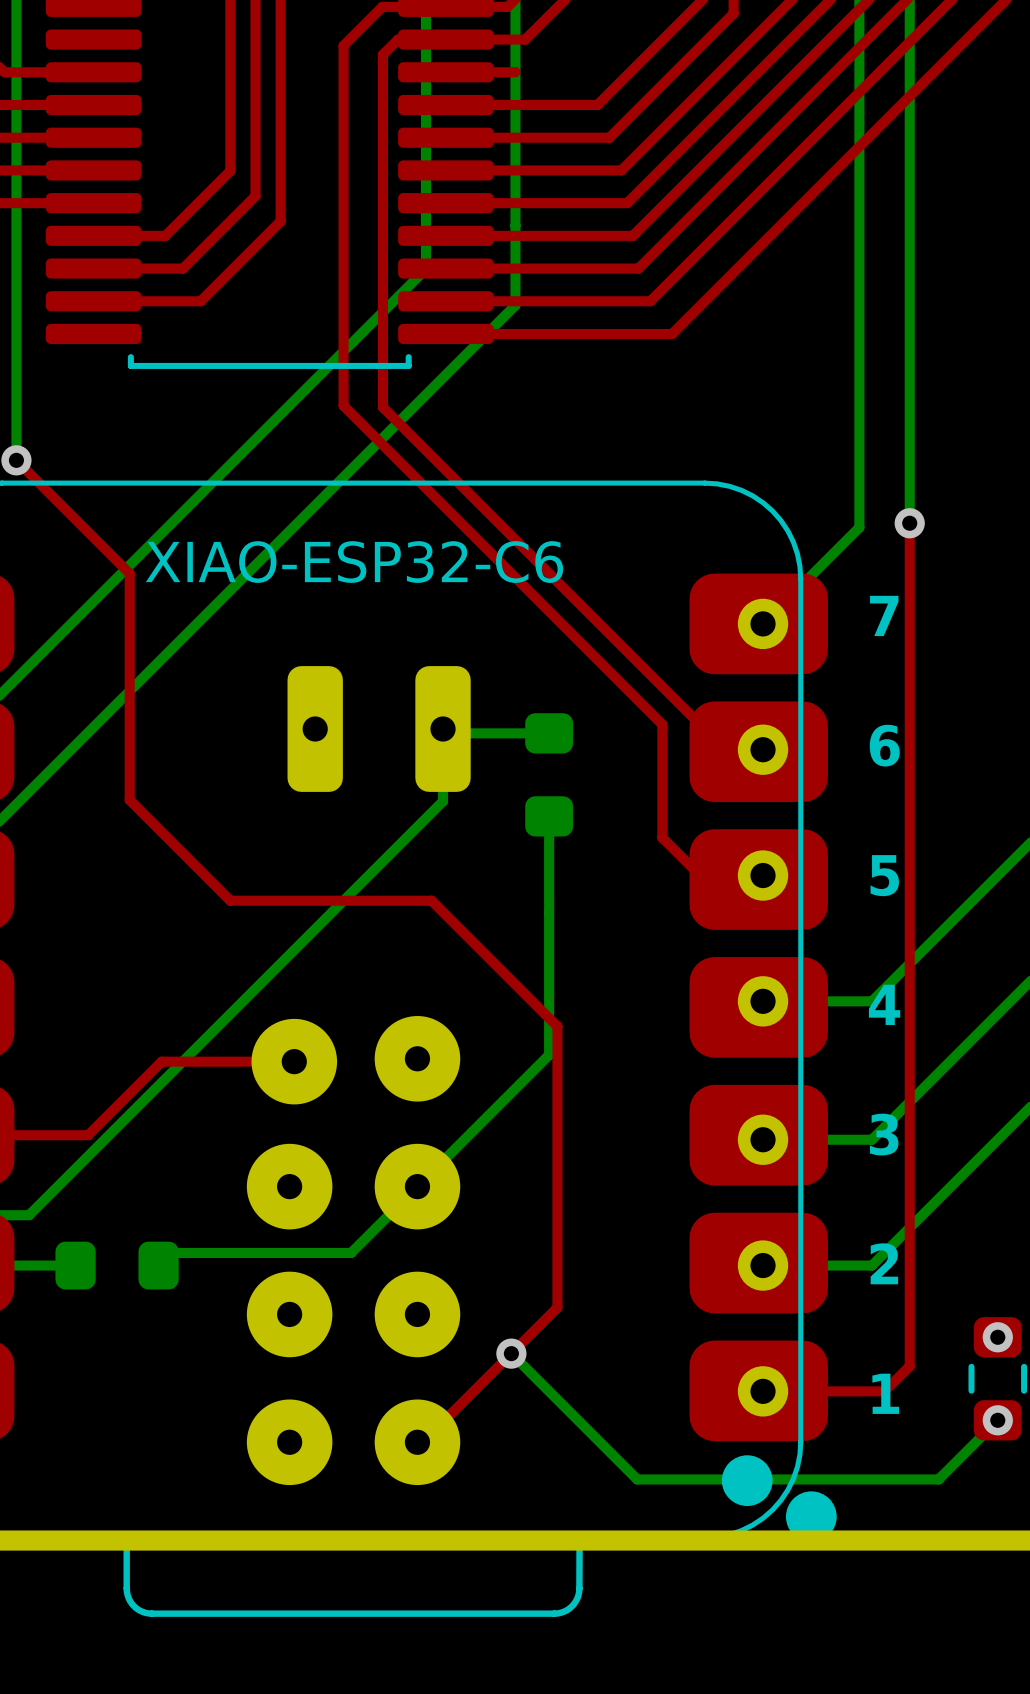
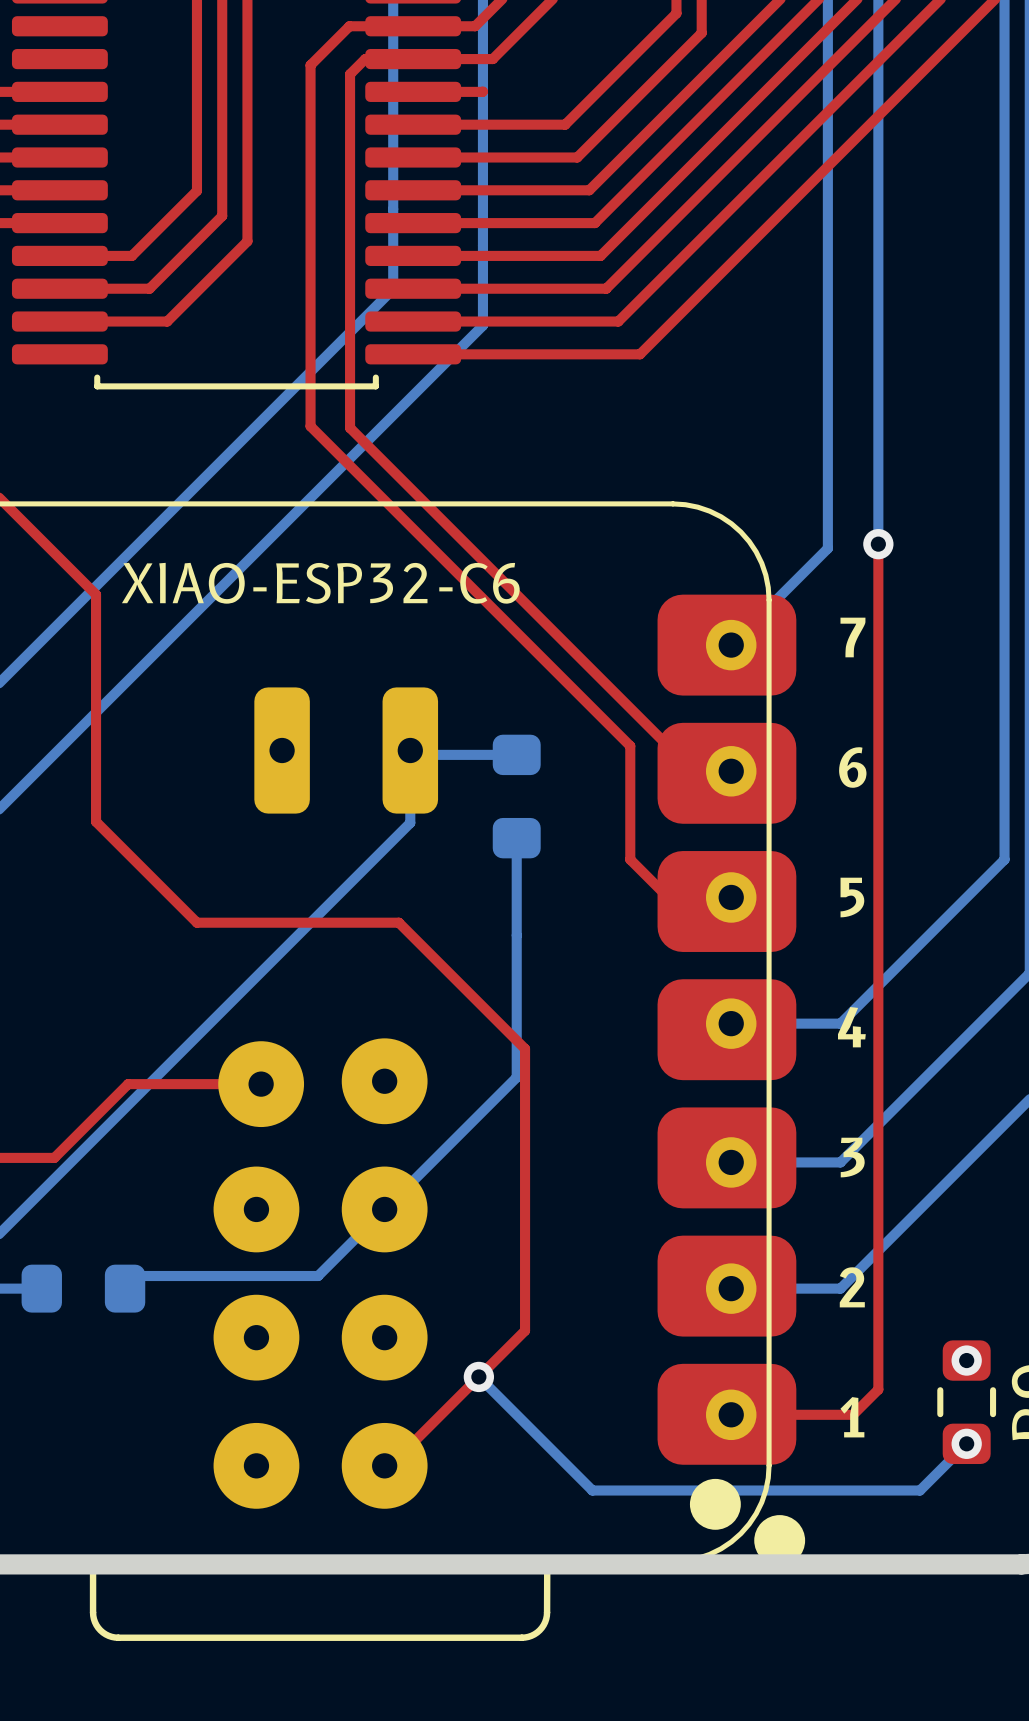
bottom track: (624, 1466) (637, 1479) (938, 1479) (951, 1466) -> (592, 1490) (919, 1490)

